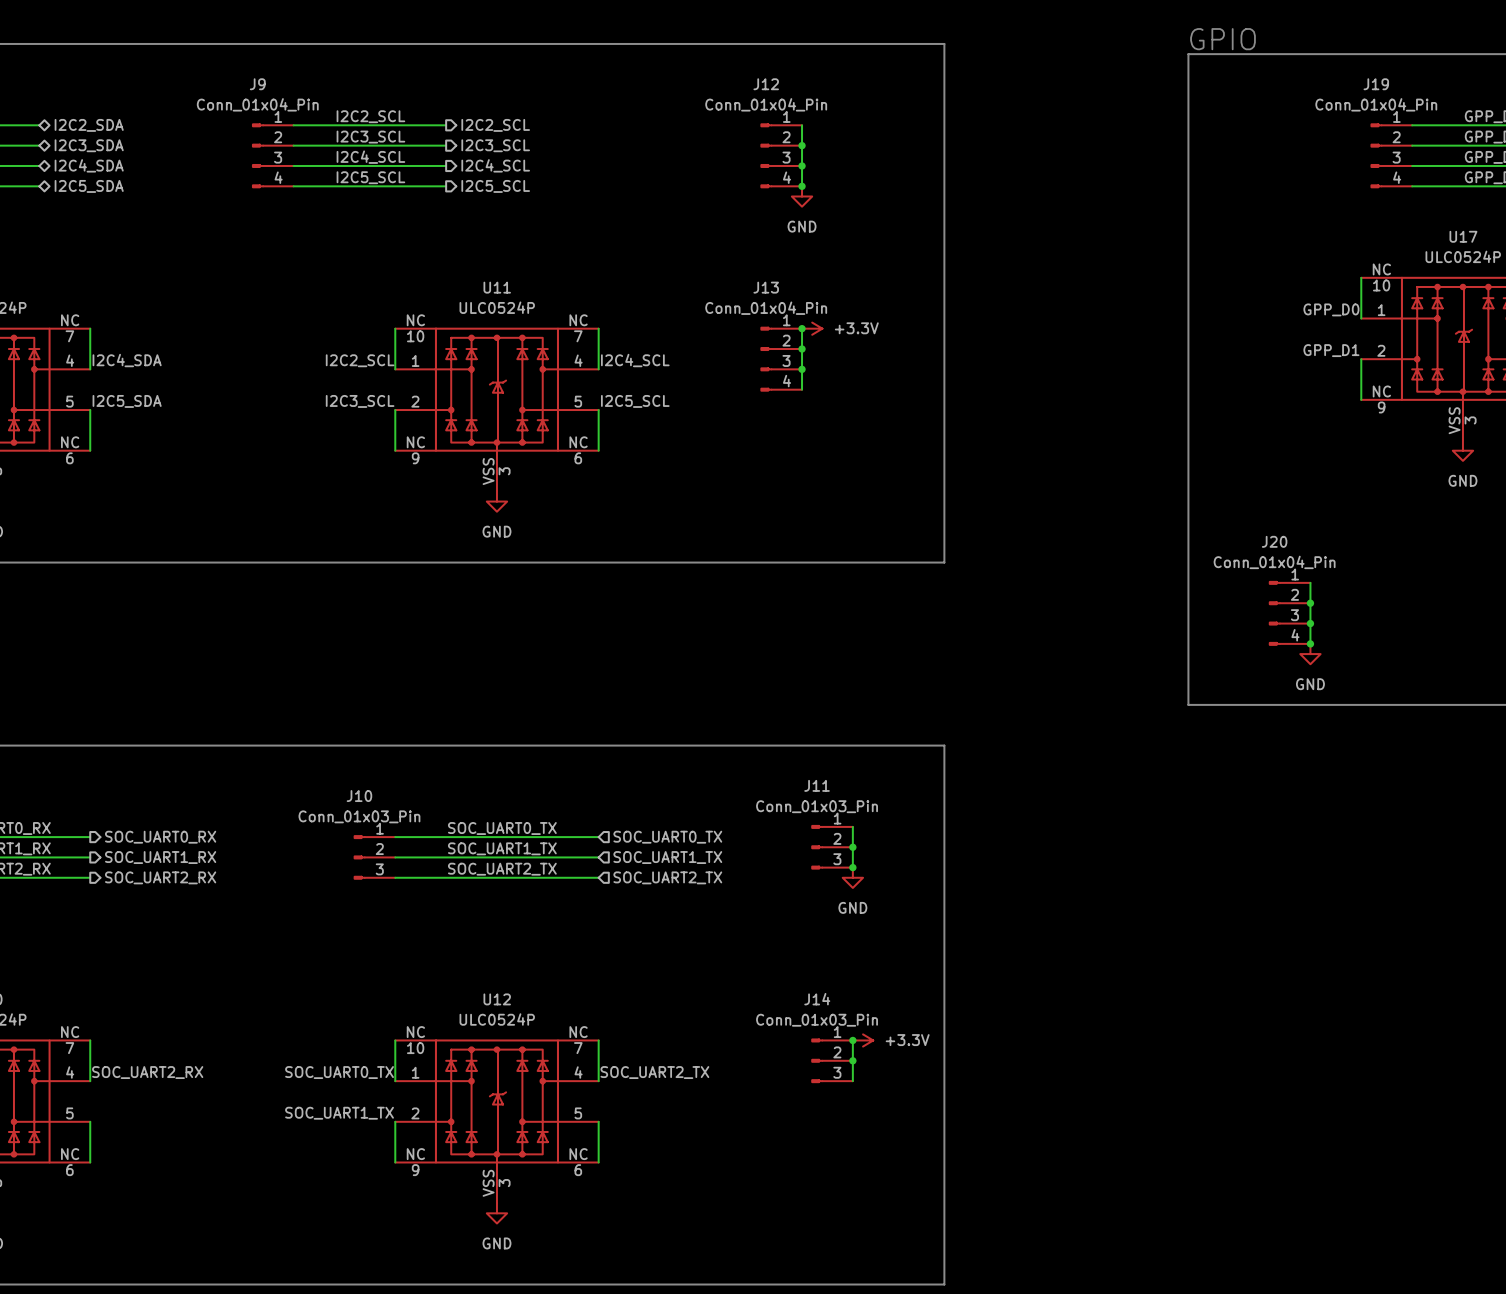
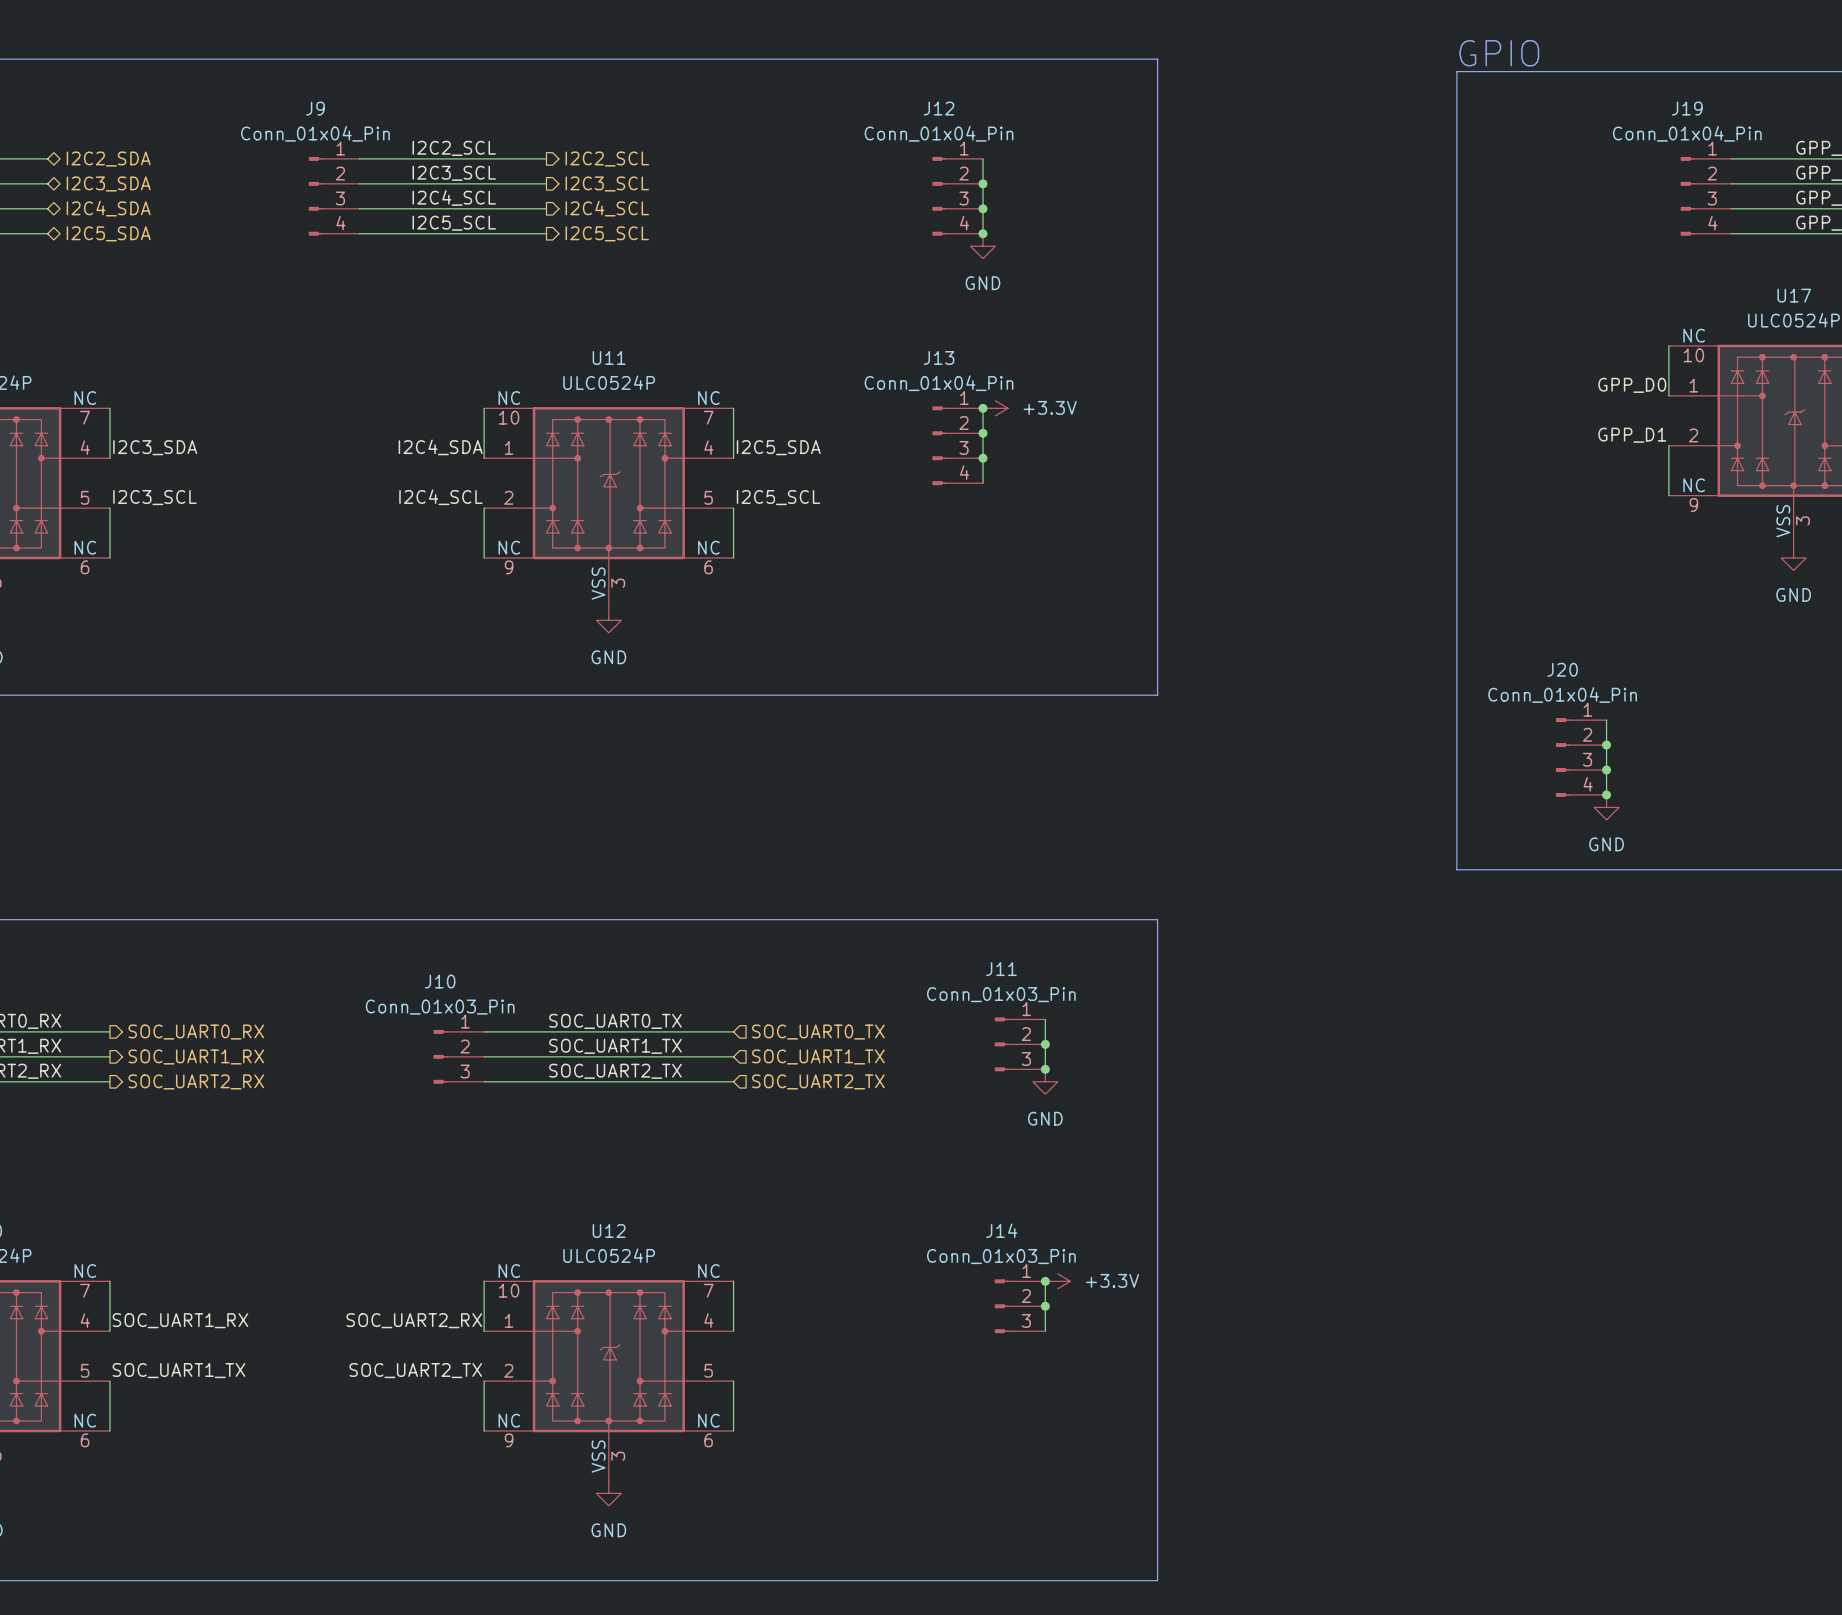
label: I2C4_SDA (127, 360) -> I2C3_SDA (155, 447)
label: I2C2_SCL (360, 360) -> I2C4_SDA (440, 447)
label: I2C4_SCL (635, 360) -> I2C5_SDA (778, 447)
label: I2C5_SDA (127, 401) -> I2C3_SCL (154, 497)
label: I2C3_SCL (360, 401) -> I2C4_SCL (440, 497)
label: SOC_UART2_RX (147, 1072) -> SOC_UART1_RX (180, 1320)
label: SOC_UART0_TX (339, 1072) -> SOC_UART2_RX (414, 1320)
label: SOC_UART2_TX (654, 1072) -> none
label: none -> SOC_UART1_TX (178, 1370)
label: SOC_UART1_TX (339, 1113) -> SOC_UART2_TX (415, 1370)

